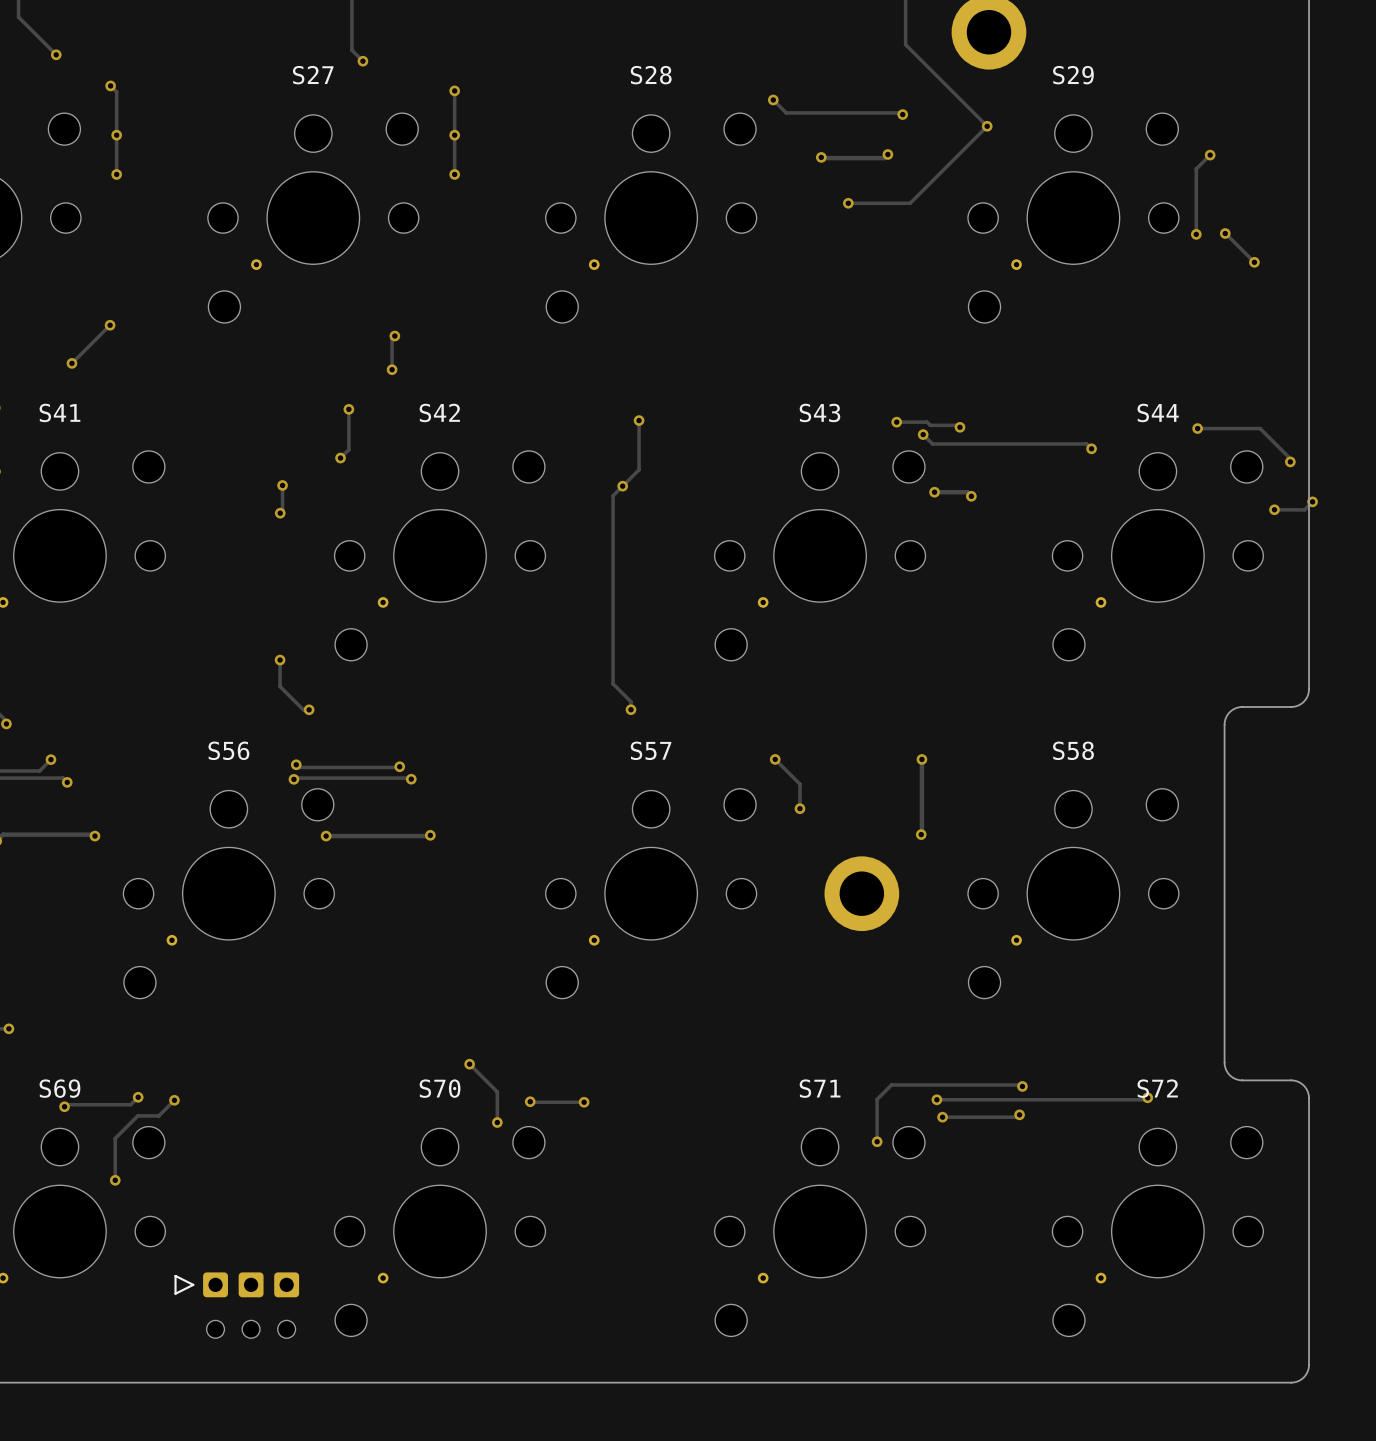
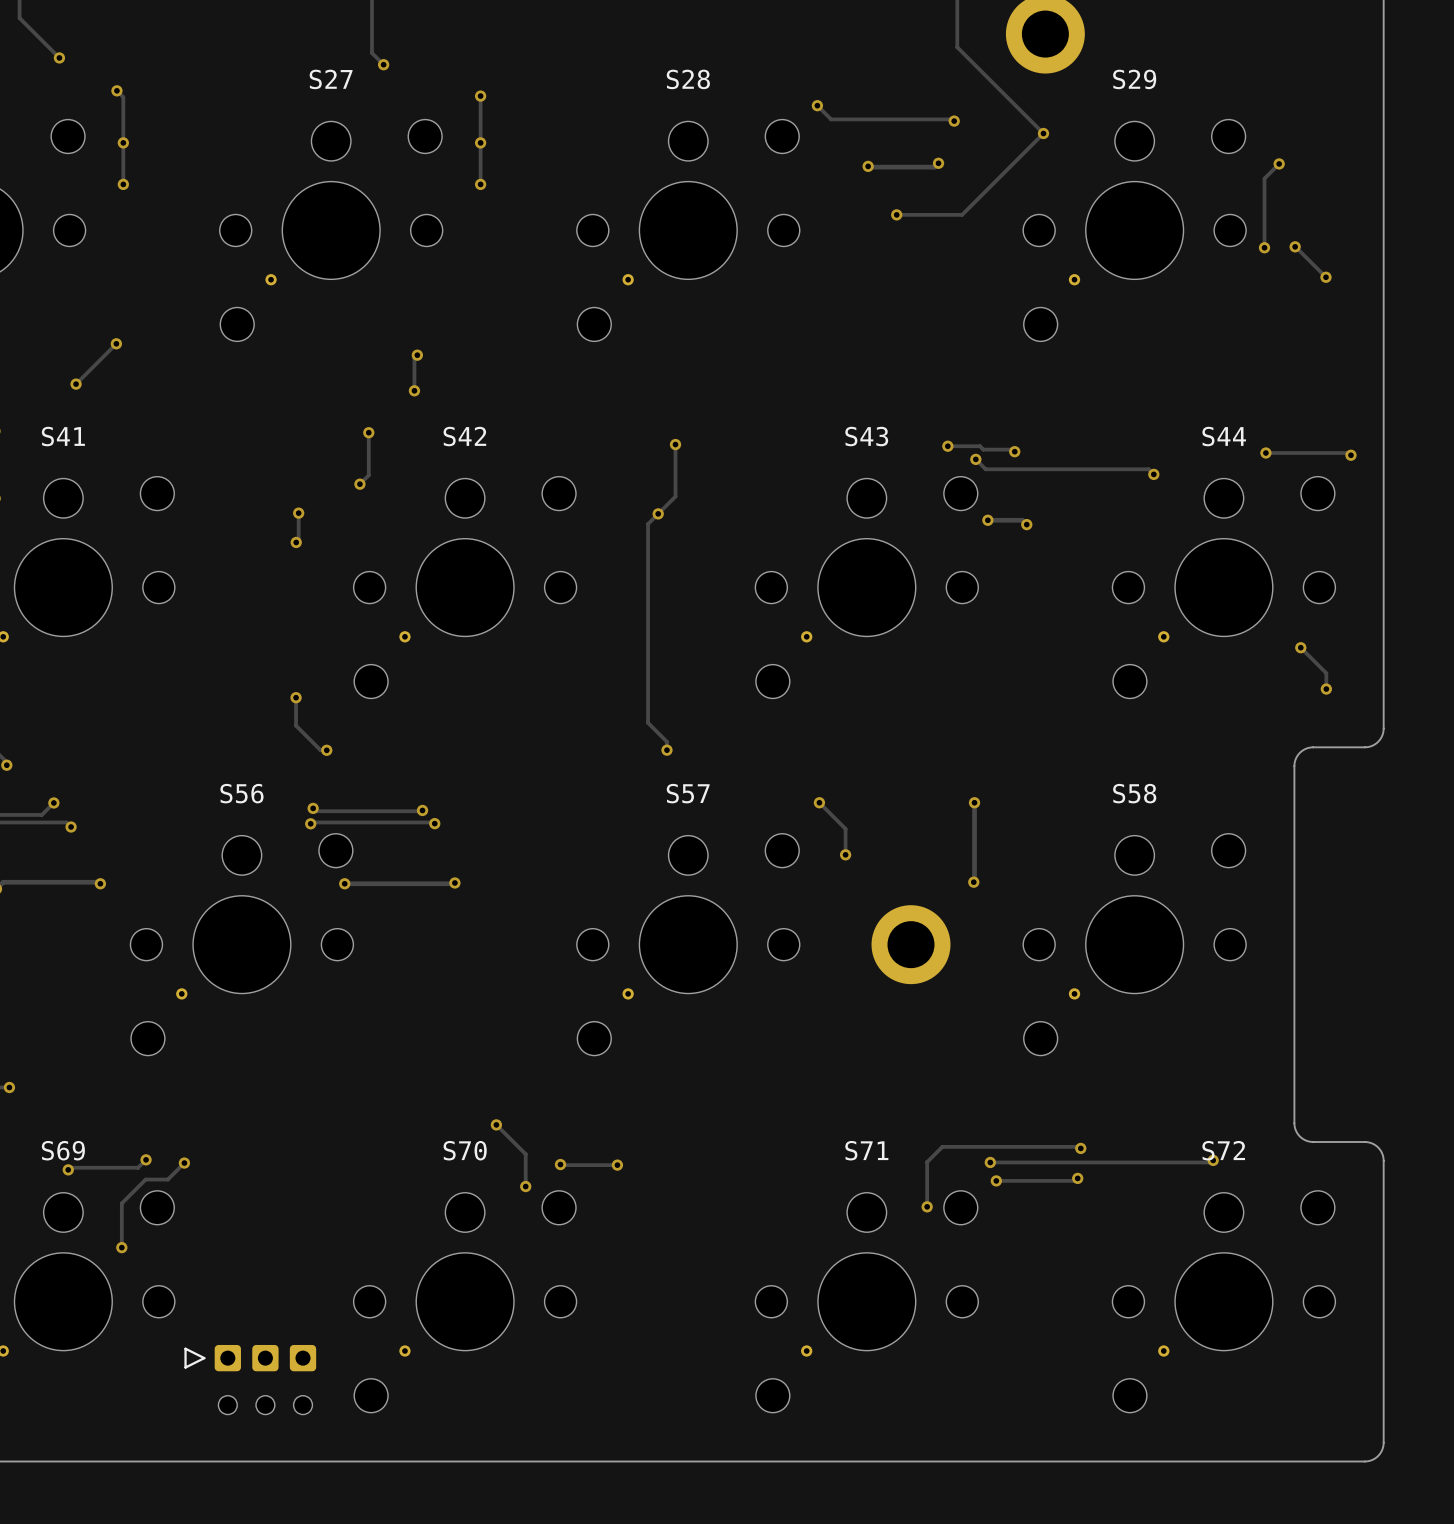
track: (1260, 428) (1290, 458) (1290, 461) -> (1331, 453) (1348, 453) (1350, 455)
via position: (1290, 461) -> (1350, 455)
track: (1312, 501) (1304, 509) (1274, 509) -> none
via: (1312, 501) -> none
via: (1274, 509) -> none
track: none -> (1300, 647) (1326, 673) (1326, 689)
via: none -> (1300, 647)
via: none -> (1326, 689)

